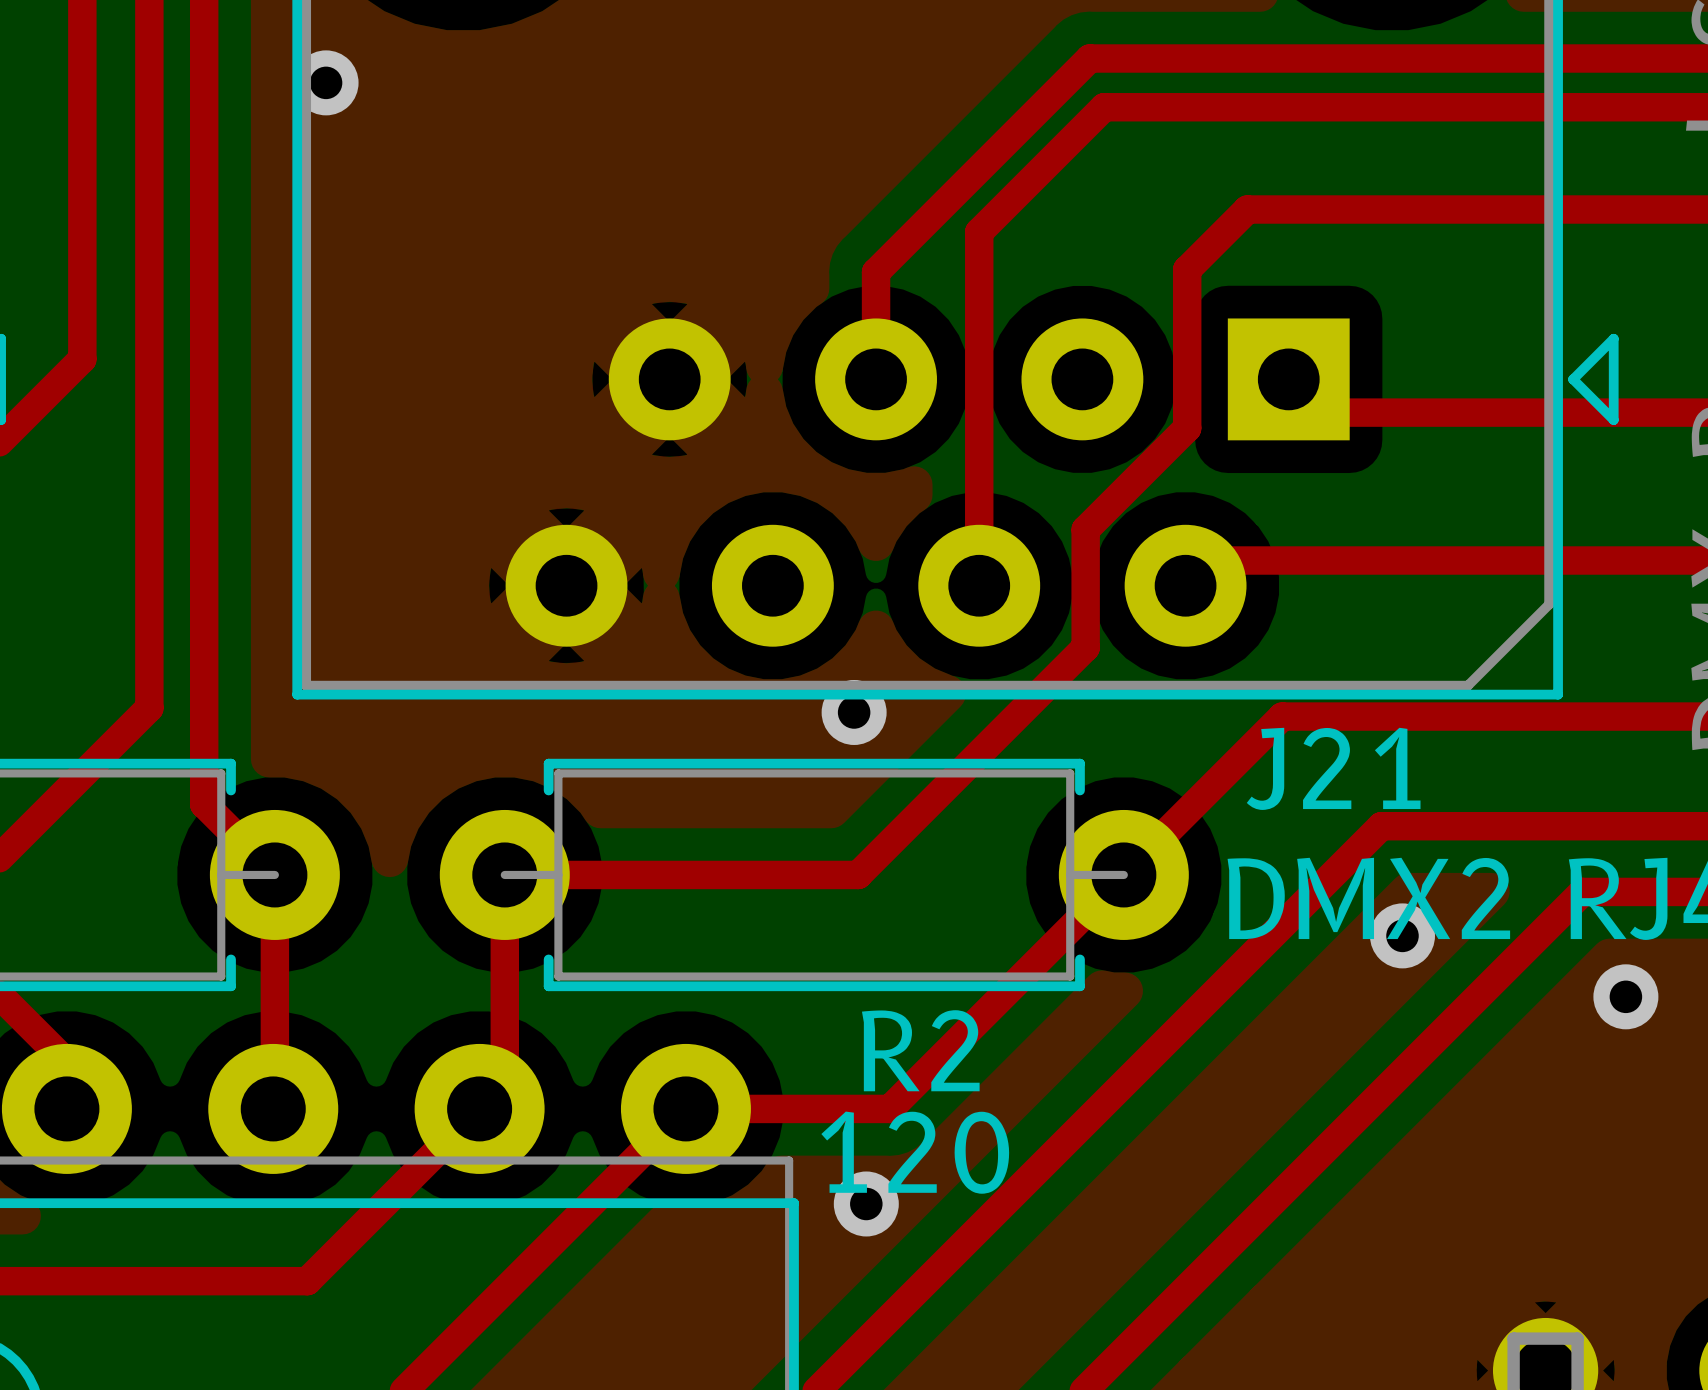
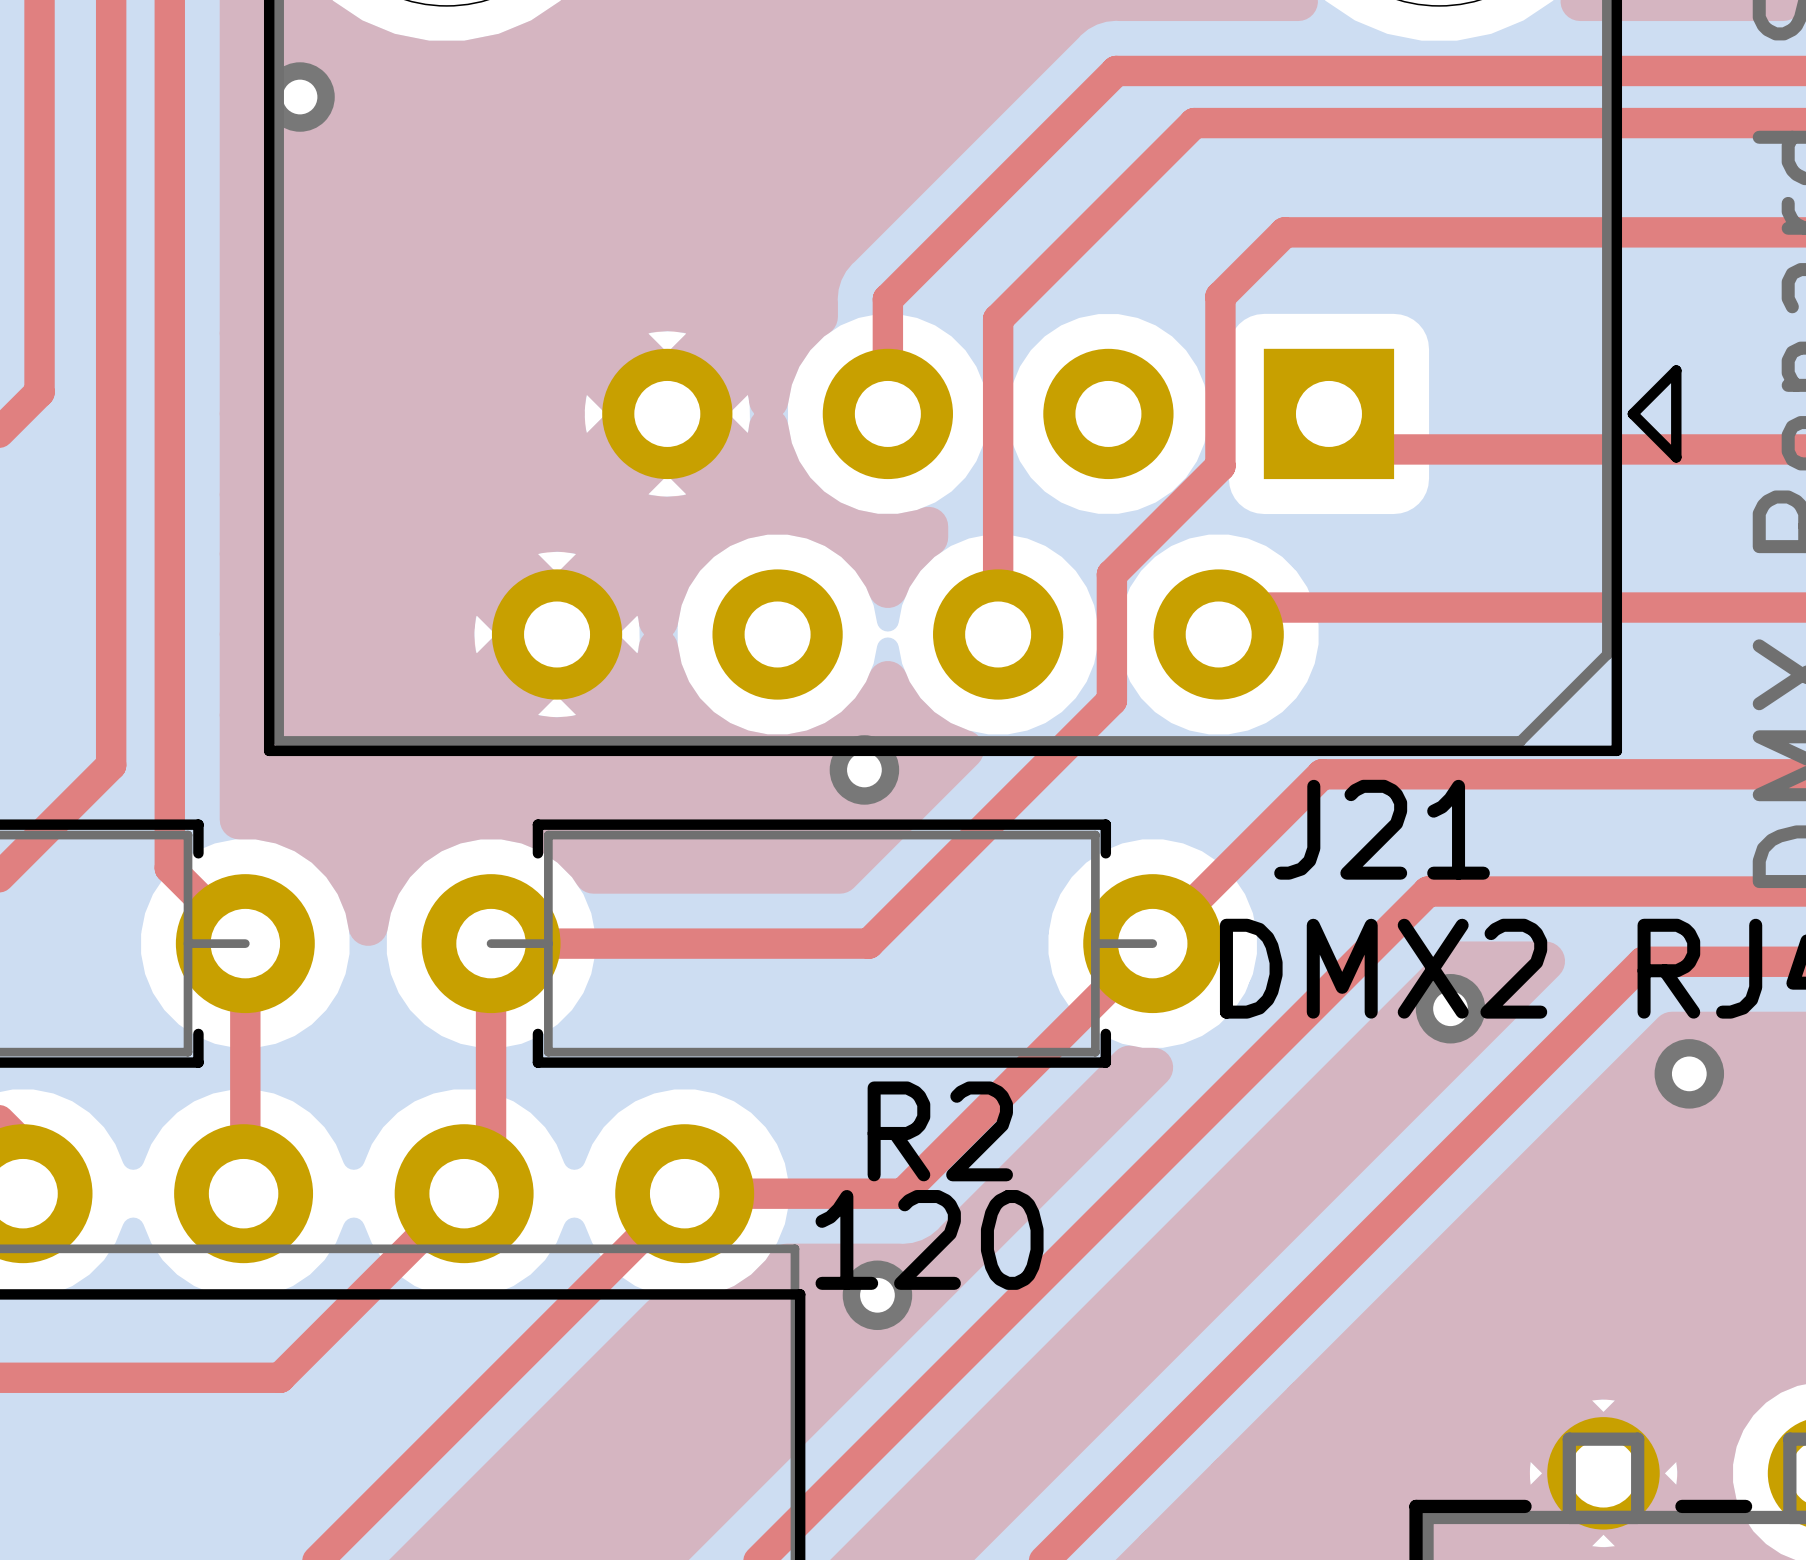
top track: (1162, 107) (1104, 107) (979, 232) (979, 290) -> (1194, 123) (998, 319)

